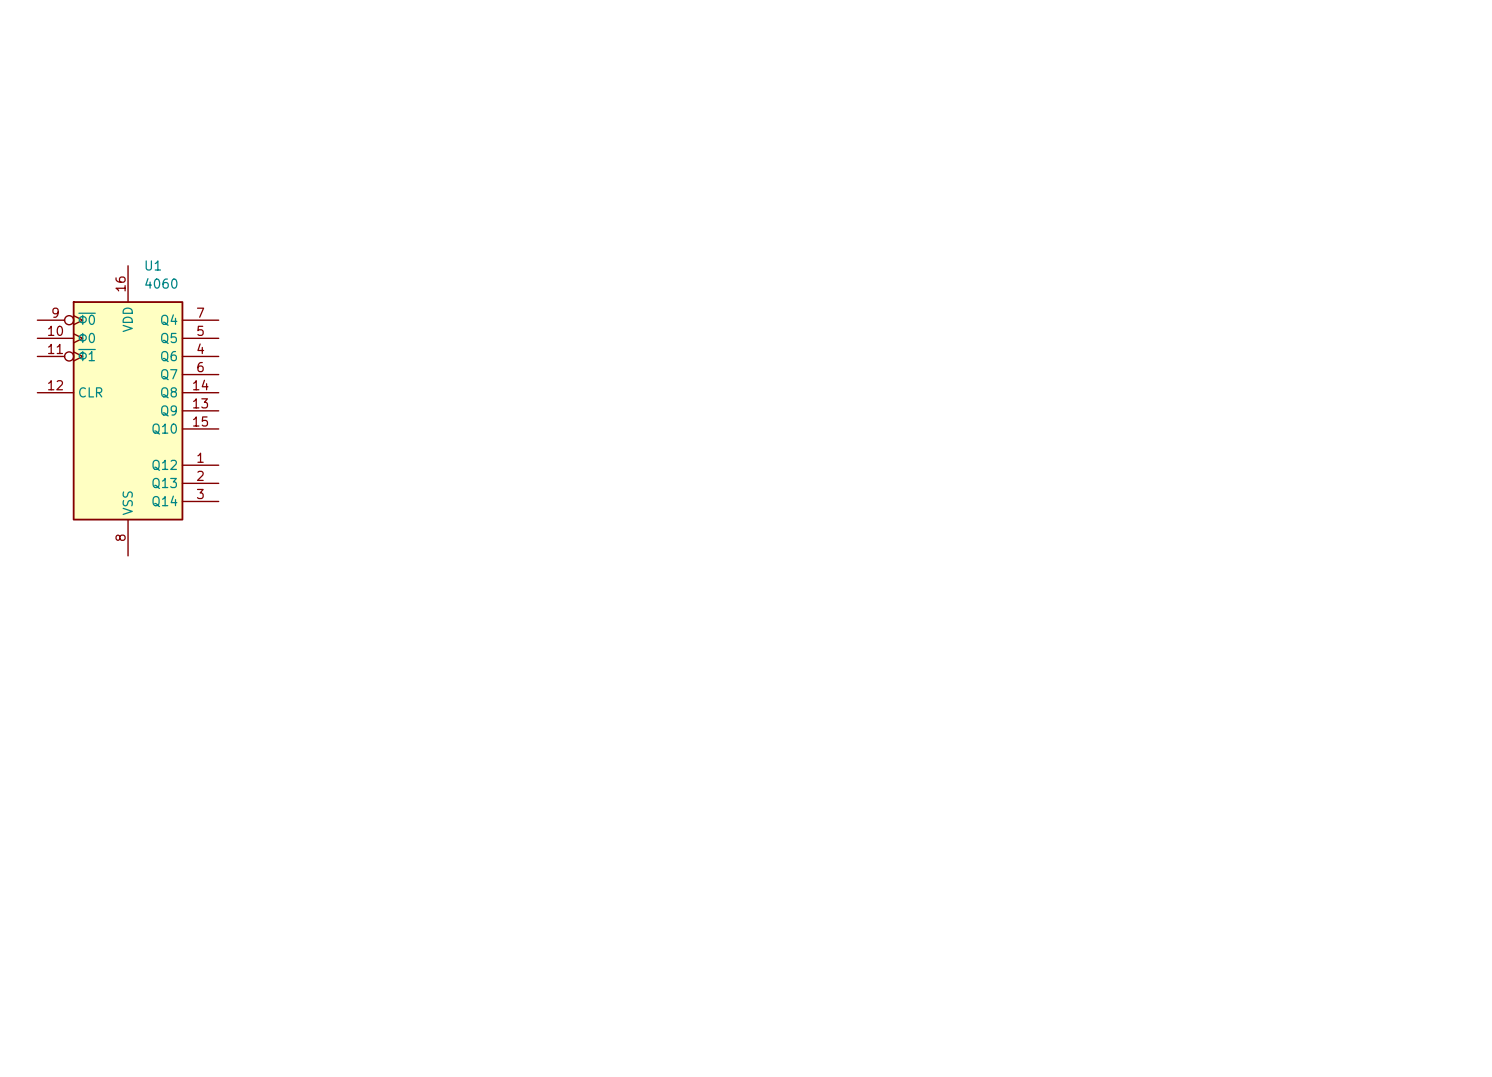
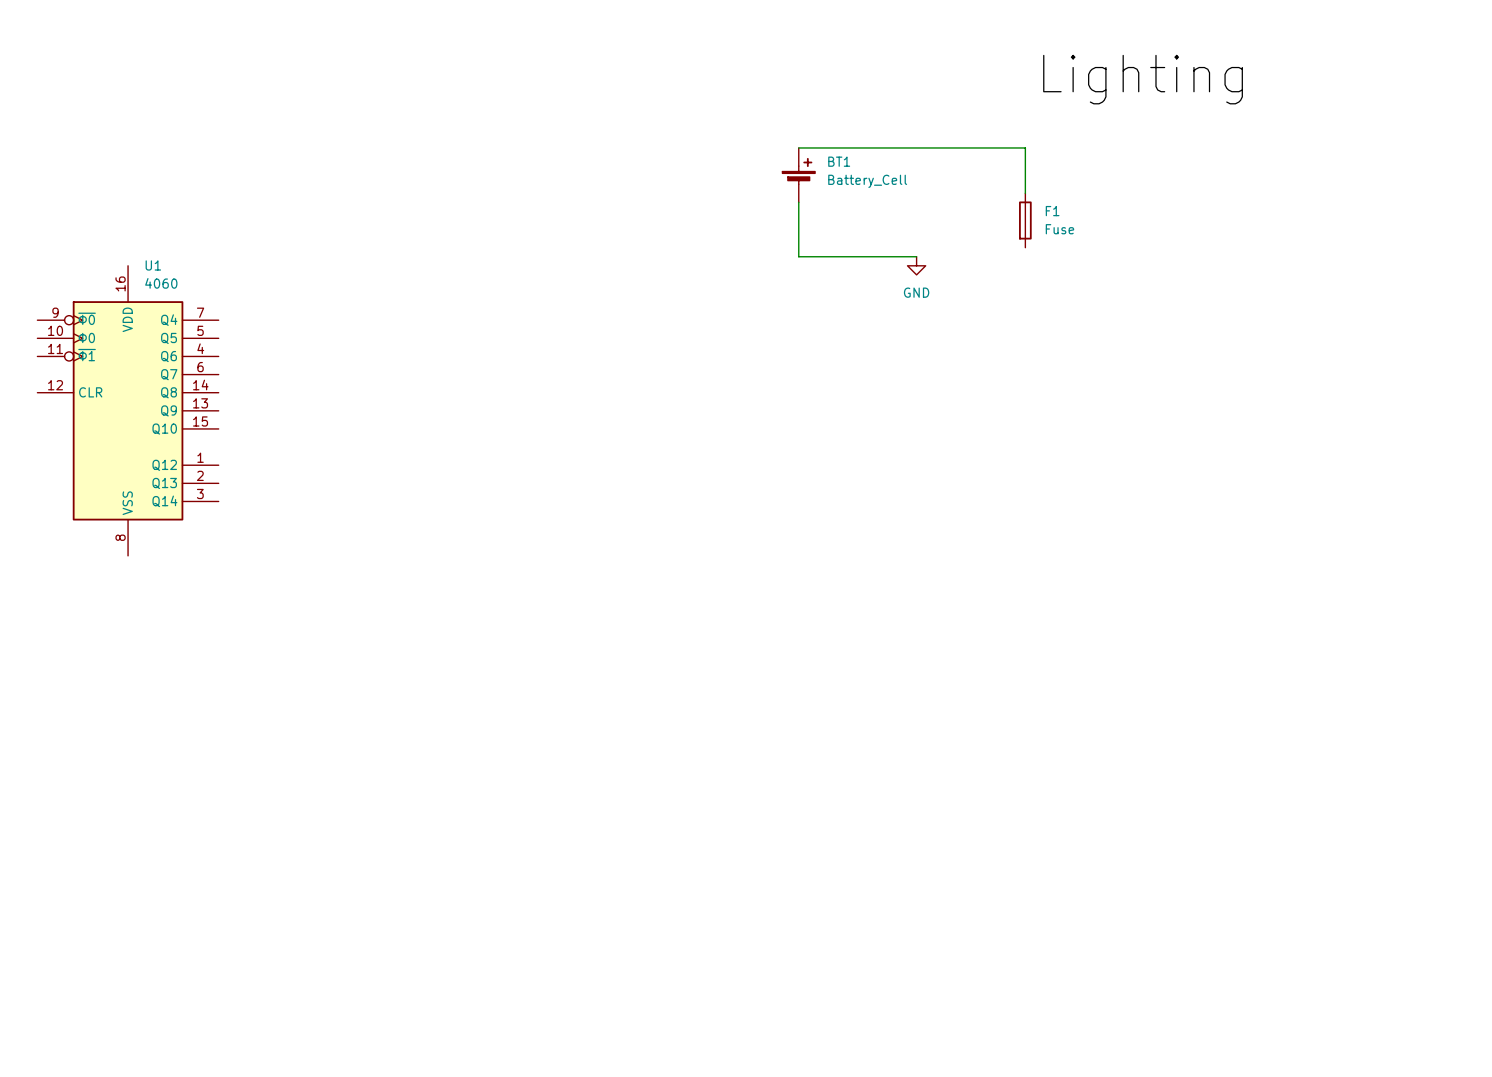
label: none -> Lighting (1143, 79)
wire: none -> (798, 147) (1025, 147) (1025, 193)
BT1: none -> Battery_Cell (798, 175)
wire: none -> (798, 202) (798, 256) (916, 256)
F1: none -> Fuse (1025, 220)
power symbol: none -> GND (916, 265)

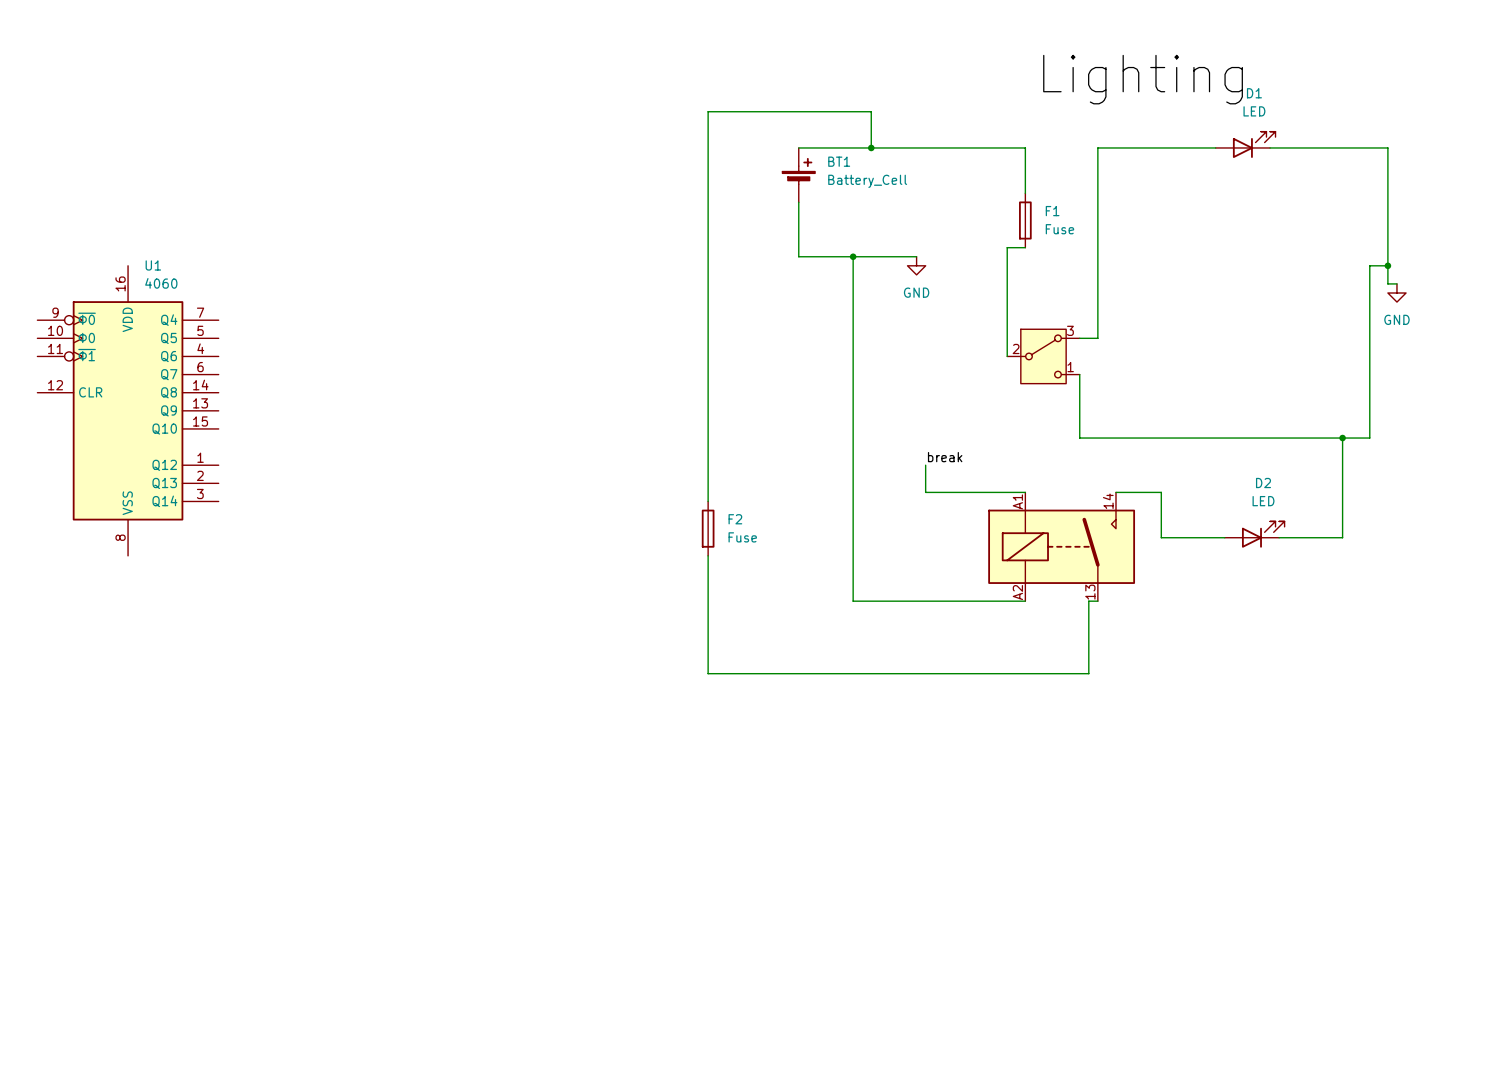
D1: none -> LED (1245, 144)
wire: none -> (871, 147) (871, 111) (708, 111) (708, 501)
junction: none -> (871, 147)
wire: none -> (1215, 147) (1097, 147) (1097, 338) (1079, 338)
wire: none -> (1270, 147) (1387, 147) (1387, 283) (1396, 283)
wire: none -> (1025, 247) (1007, 247) (1007, 356)
wire: none -> (853, 256) (853, 601) (1025, 601)
junction: none -> (853, 256)
wire: none -> (1387, 265) (1369, 265) (1369, 438) (1079, 438) (1079, 374)
junction: none -> (1387, 265)
power symbol: none -> GND (1396, 293)
part: none -> (1043, 356)
wire: none -> (1342, 438) (1342, 537) (1279, 537)
junction: none -> (1342, 438)
label: none -> break (945, 457)
wire: none -> (925, 465) (925, 492) (1025, 492)
wire: none -> (1115, 492) (1161, 492) (1161, 537) (1224, 537)
F2: none -> Fuse (708, 528)
D2: none -> LED (1254, 534)
part: none -> (1061, 546)
wire: none -> (708, 555) (708, 673) (1088, 673) (1088, 601) (1097, 601)

